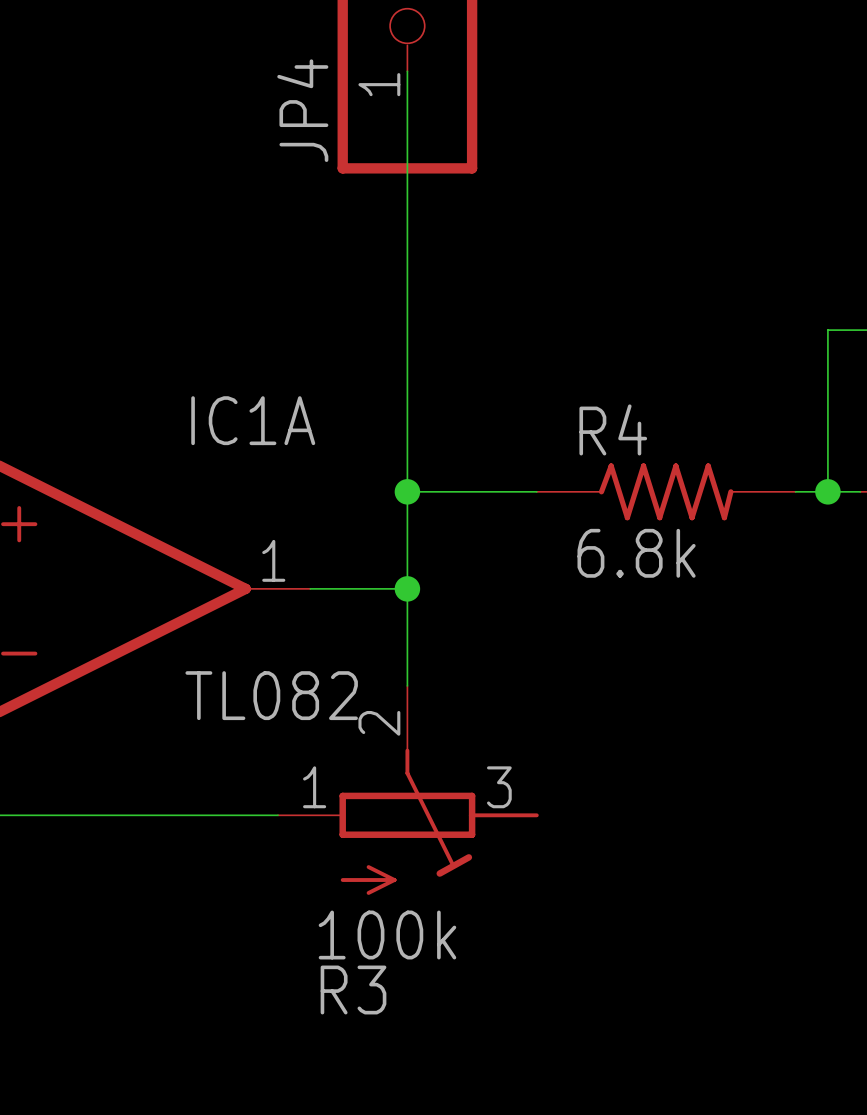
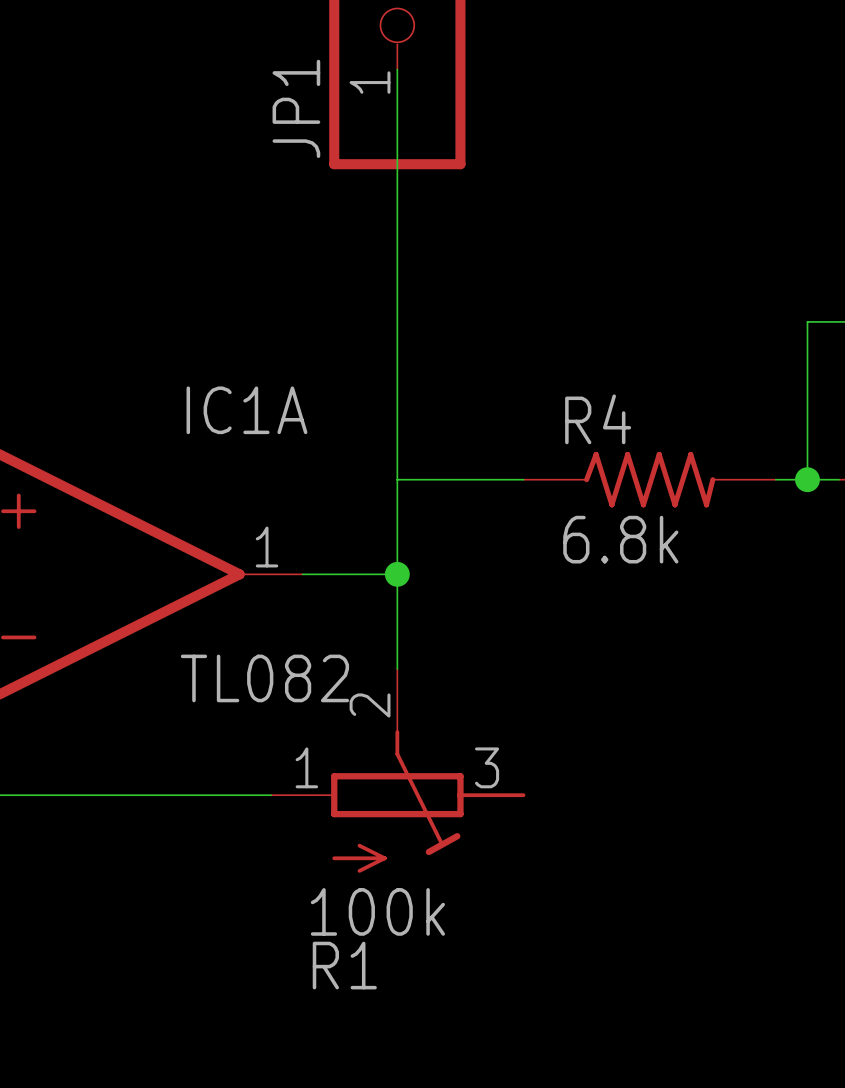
JP4 name: JP4 (302, 110) -> JP1 (296, 108)
junction: (407, 491) -> none
R3 name: R3 (353, 989) -> R1 (344, 965)

